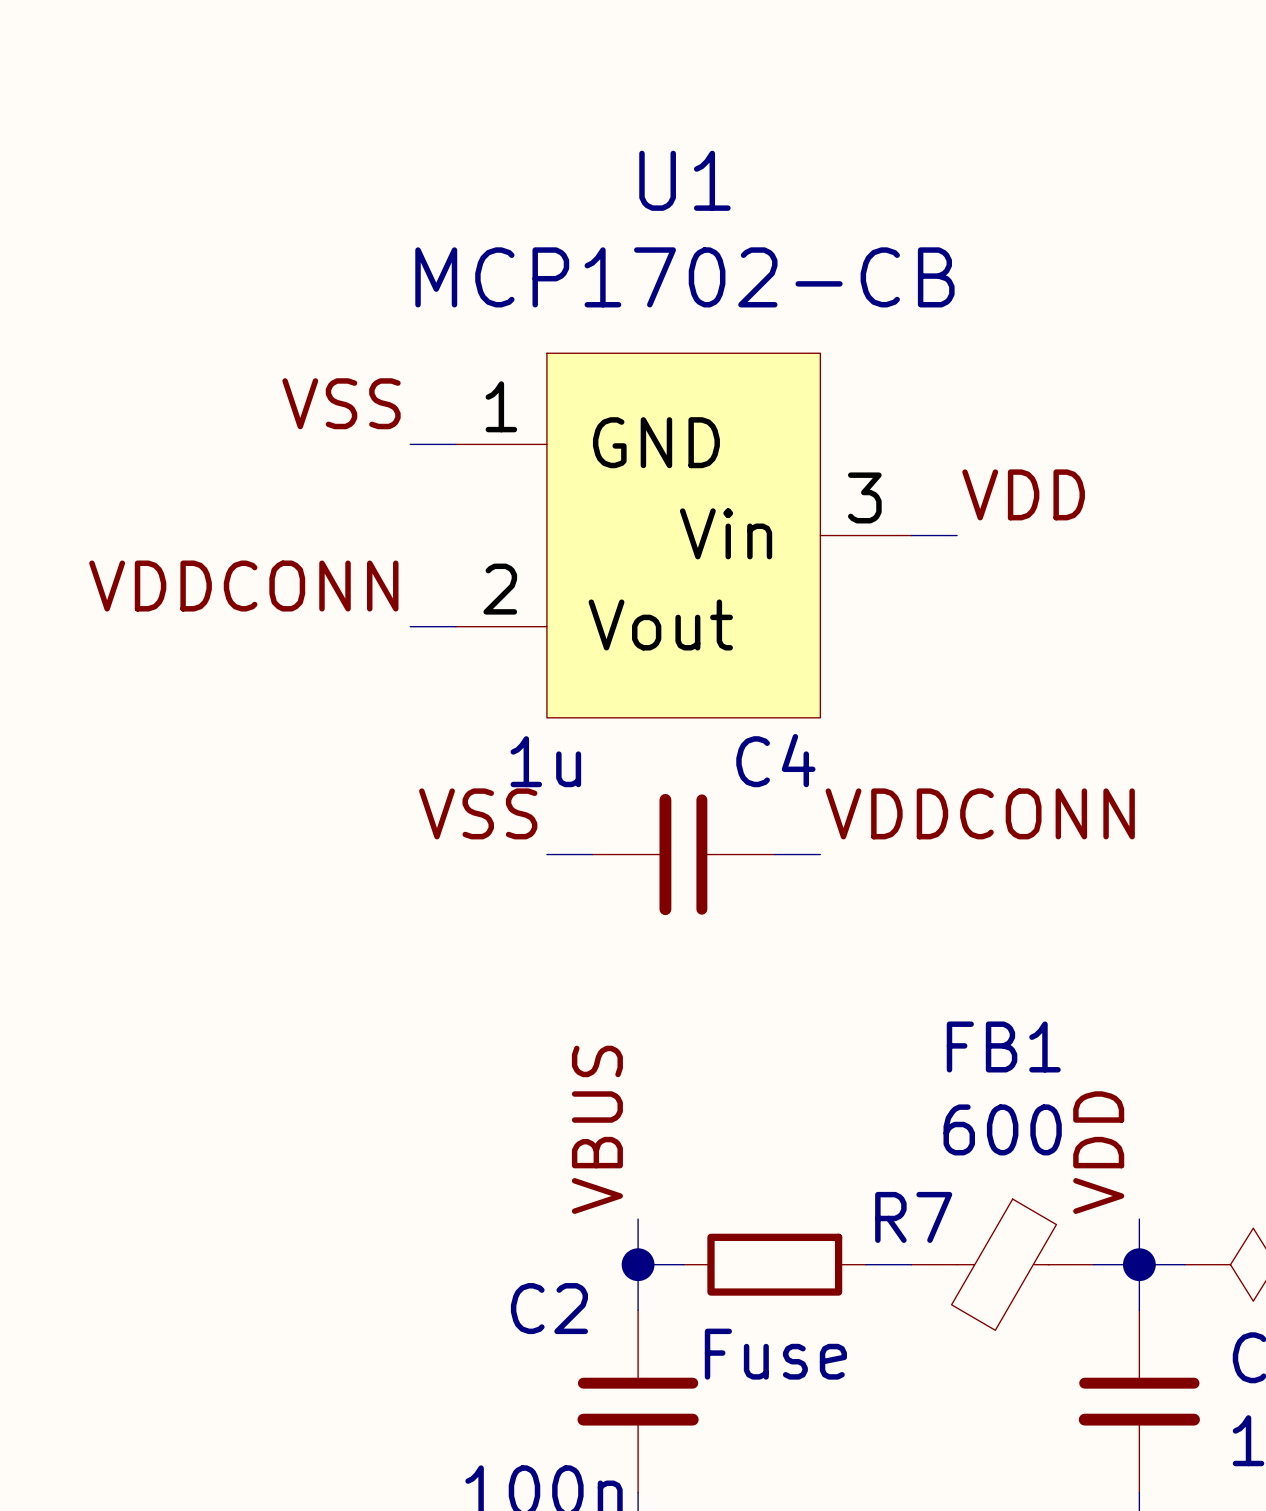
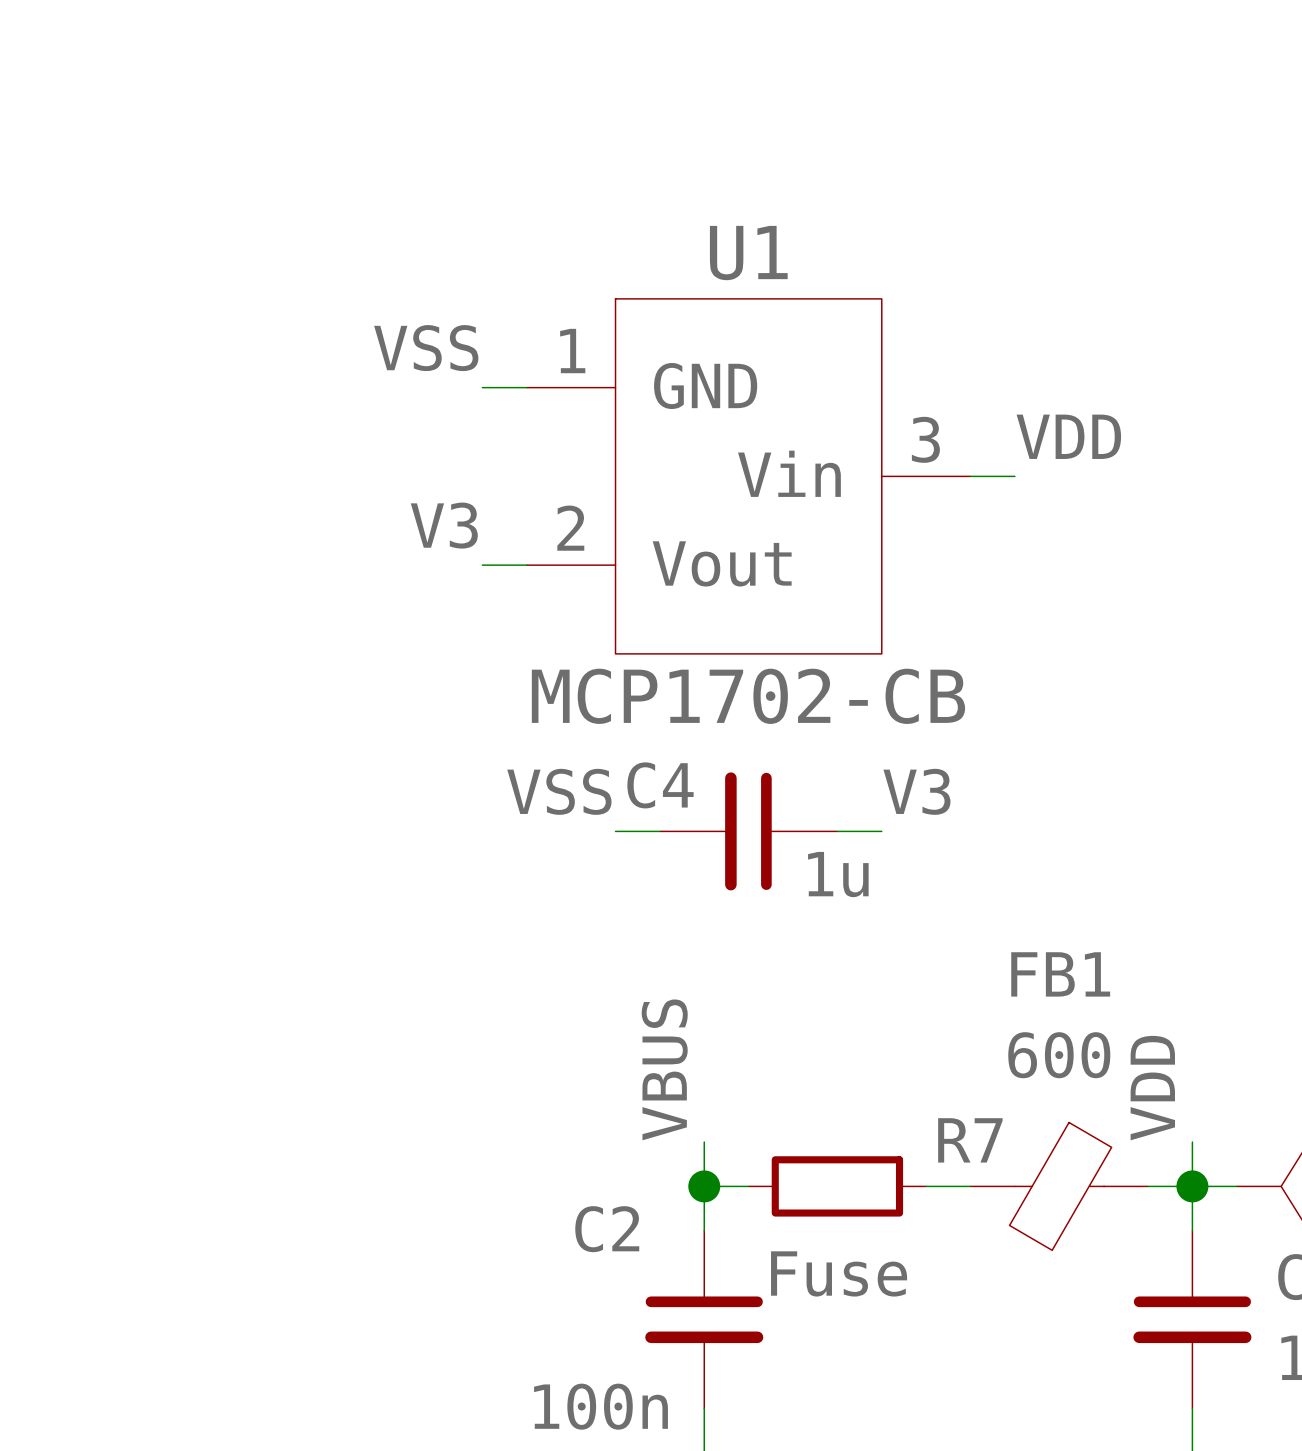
U1 name position: U1 (684, 180) -> U1 (748, 253)
U1 value position: MCP1702-CB (684, 277) -> MCP1702-CB (748, 696)
label: VDDCONN (243, 586) -> V3 (444, 525)
C4 name position: C4 (775, 760) -> C4 (660, 785)
C4 value position: 1u (545, 761) -> 1u (838, 874)
label position: VSS (478, 813) -> VSS (559, 791)
label: VDDCONN (980, 813) -> none
wire: (546, 854) (592, 854) -> (615, 831) (659, 831)
C4 position: (683, 854) -> (748, 831)
wire: (774, 854) (820, 854) -> (837, 831) (881, 831)
label: none -> V3 (916, 791)

